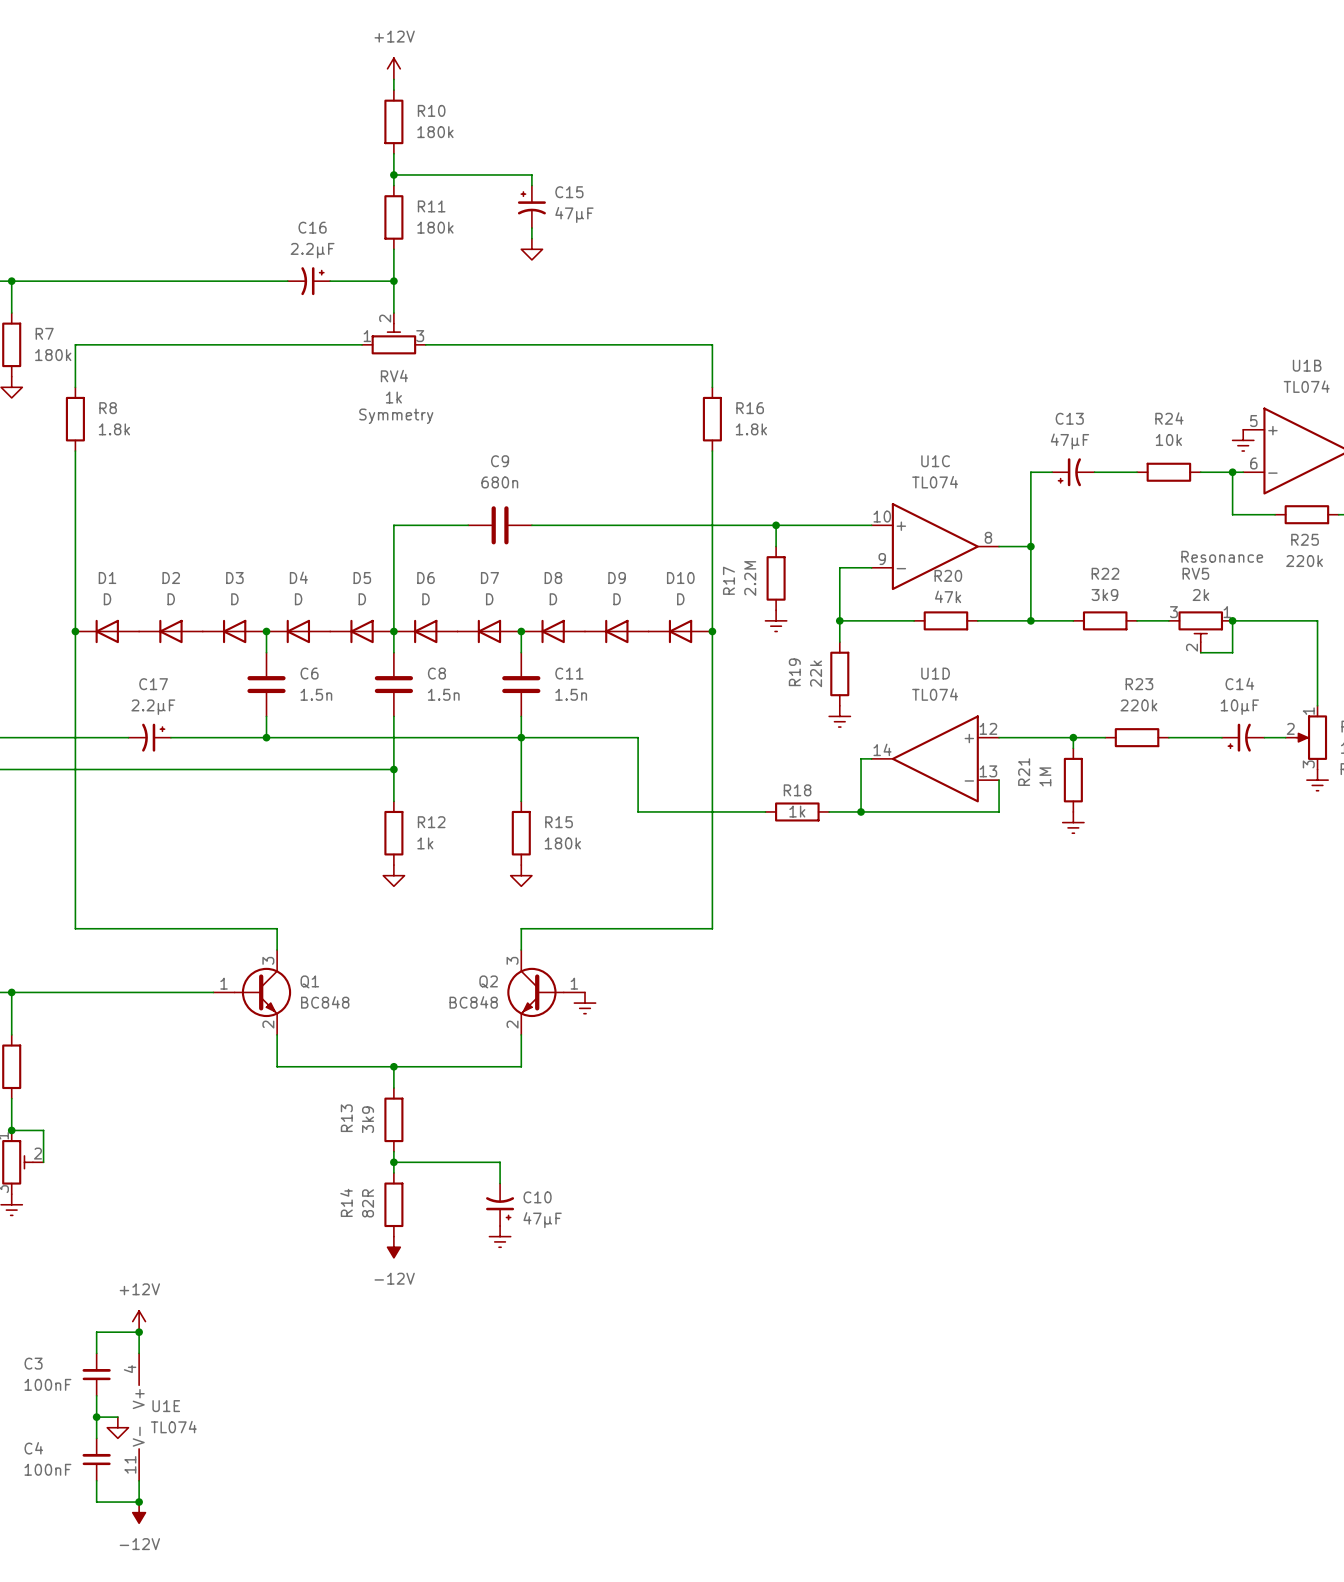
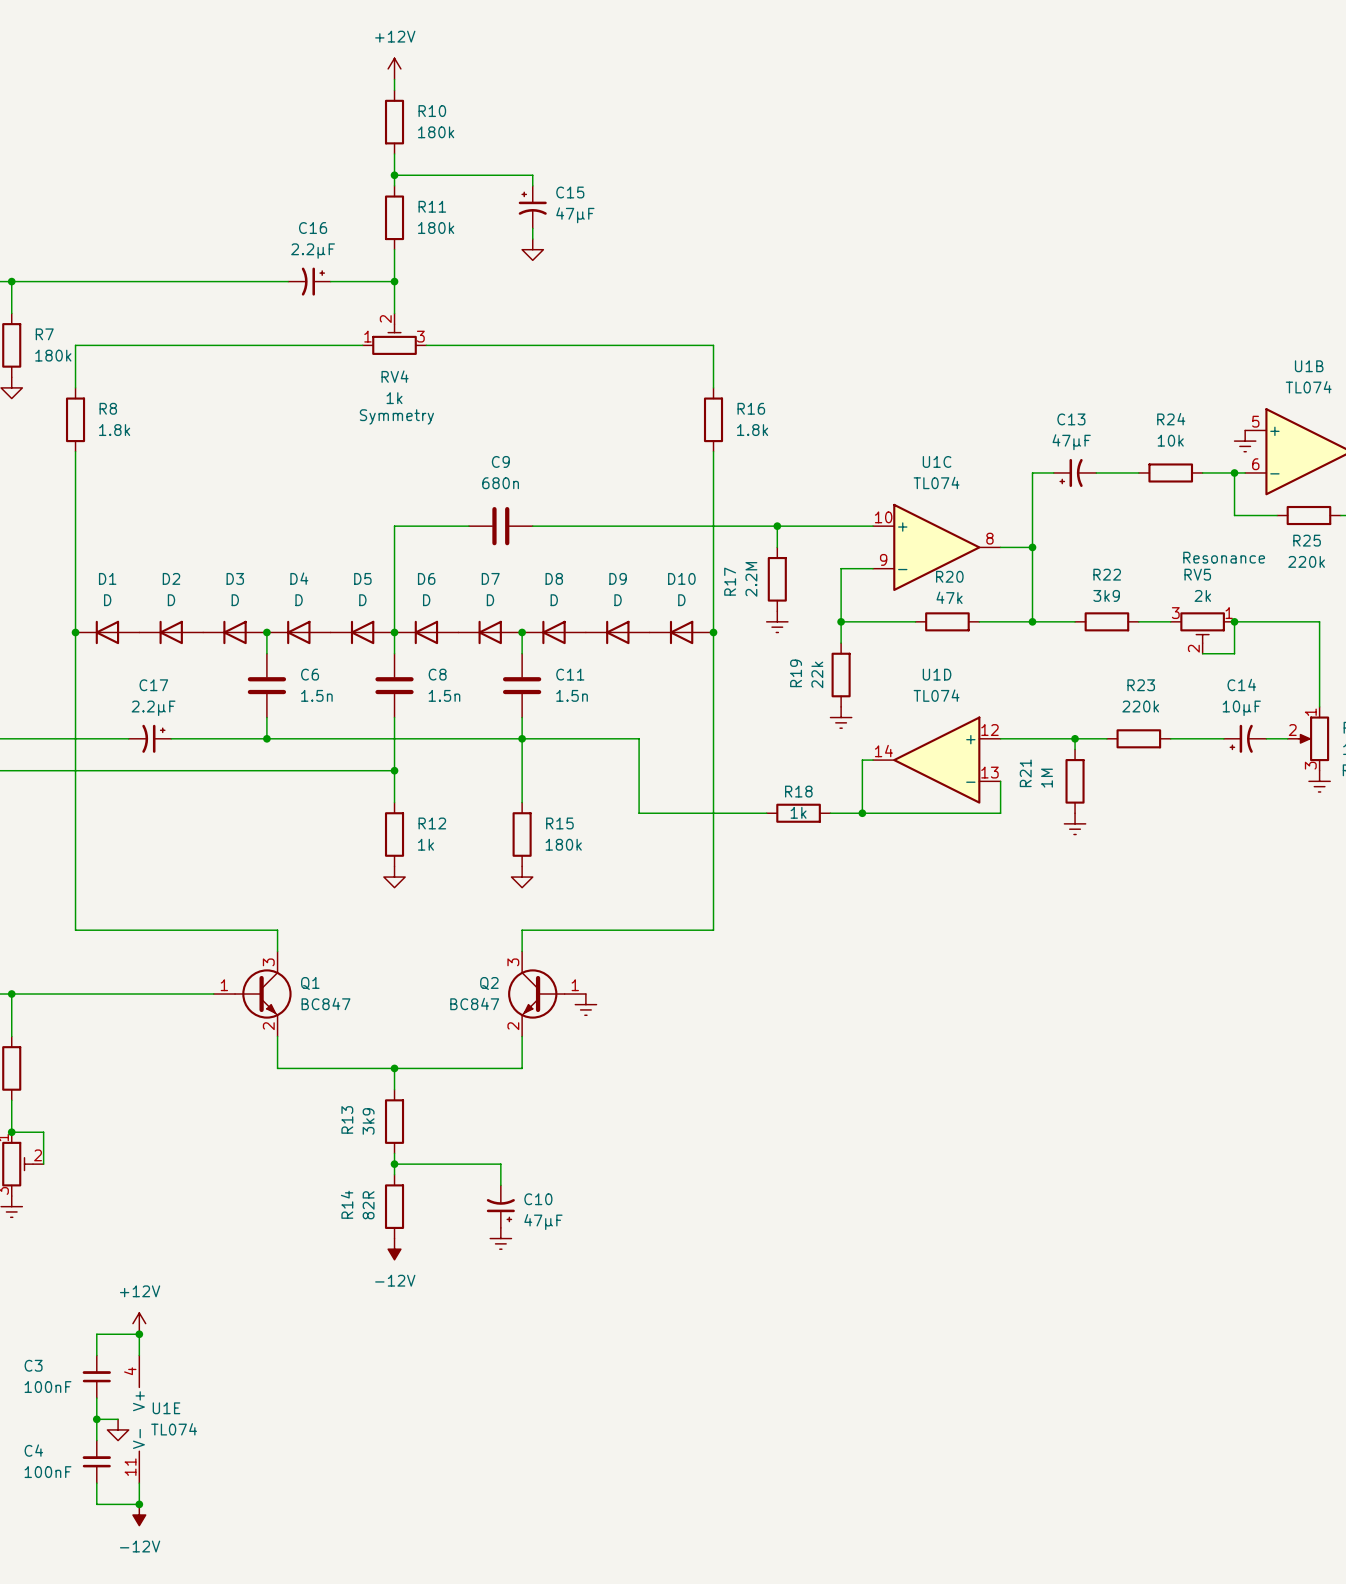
Q1 value: BC848 (325, 1002) -> BC847 (325, 1003)
Q2 value: BC848 (473, 1002) -> BC847 (474, 1003)

